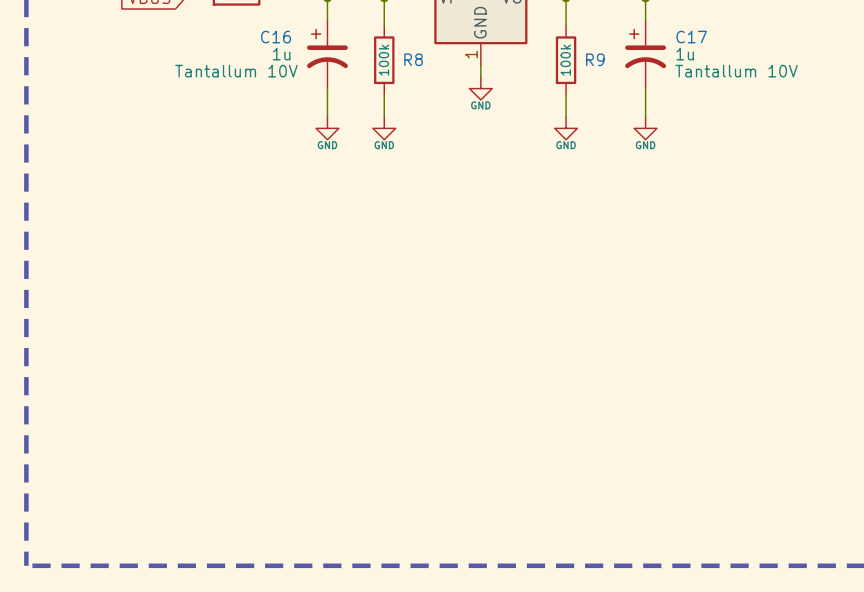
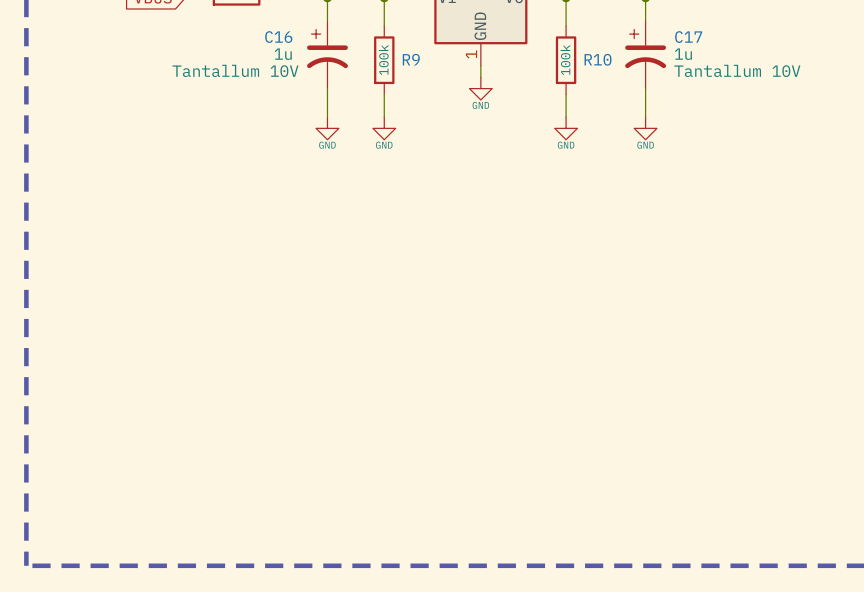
R8 name: R8 (413, 59) -> R9 (411, 59)
R9 name: R9 (595, 59) -> R10 (598, 59)

